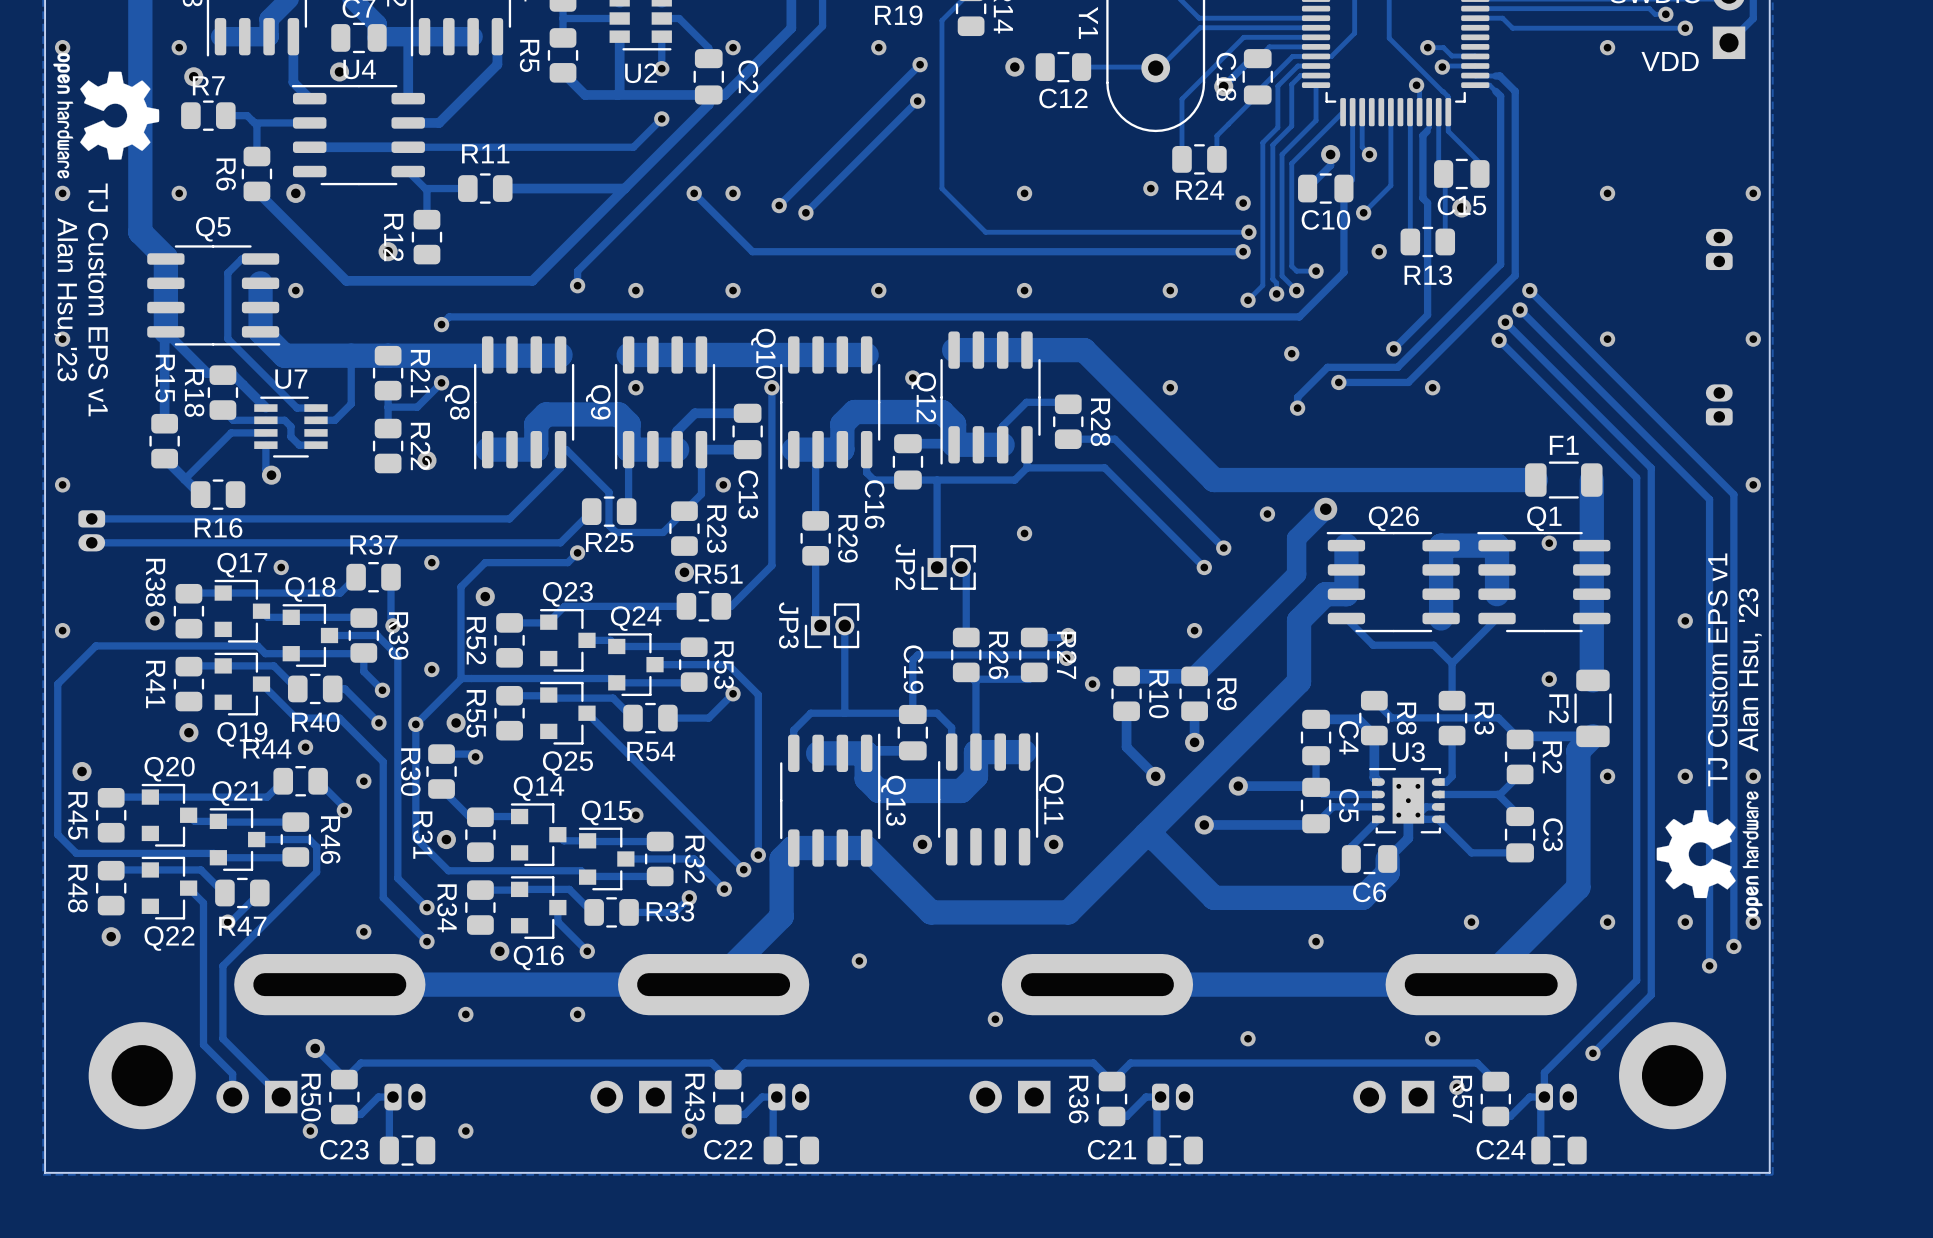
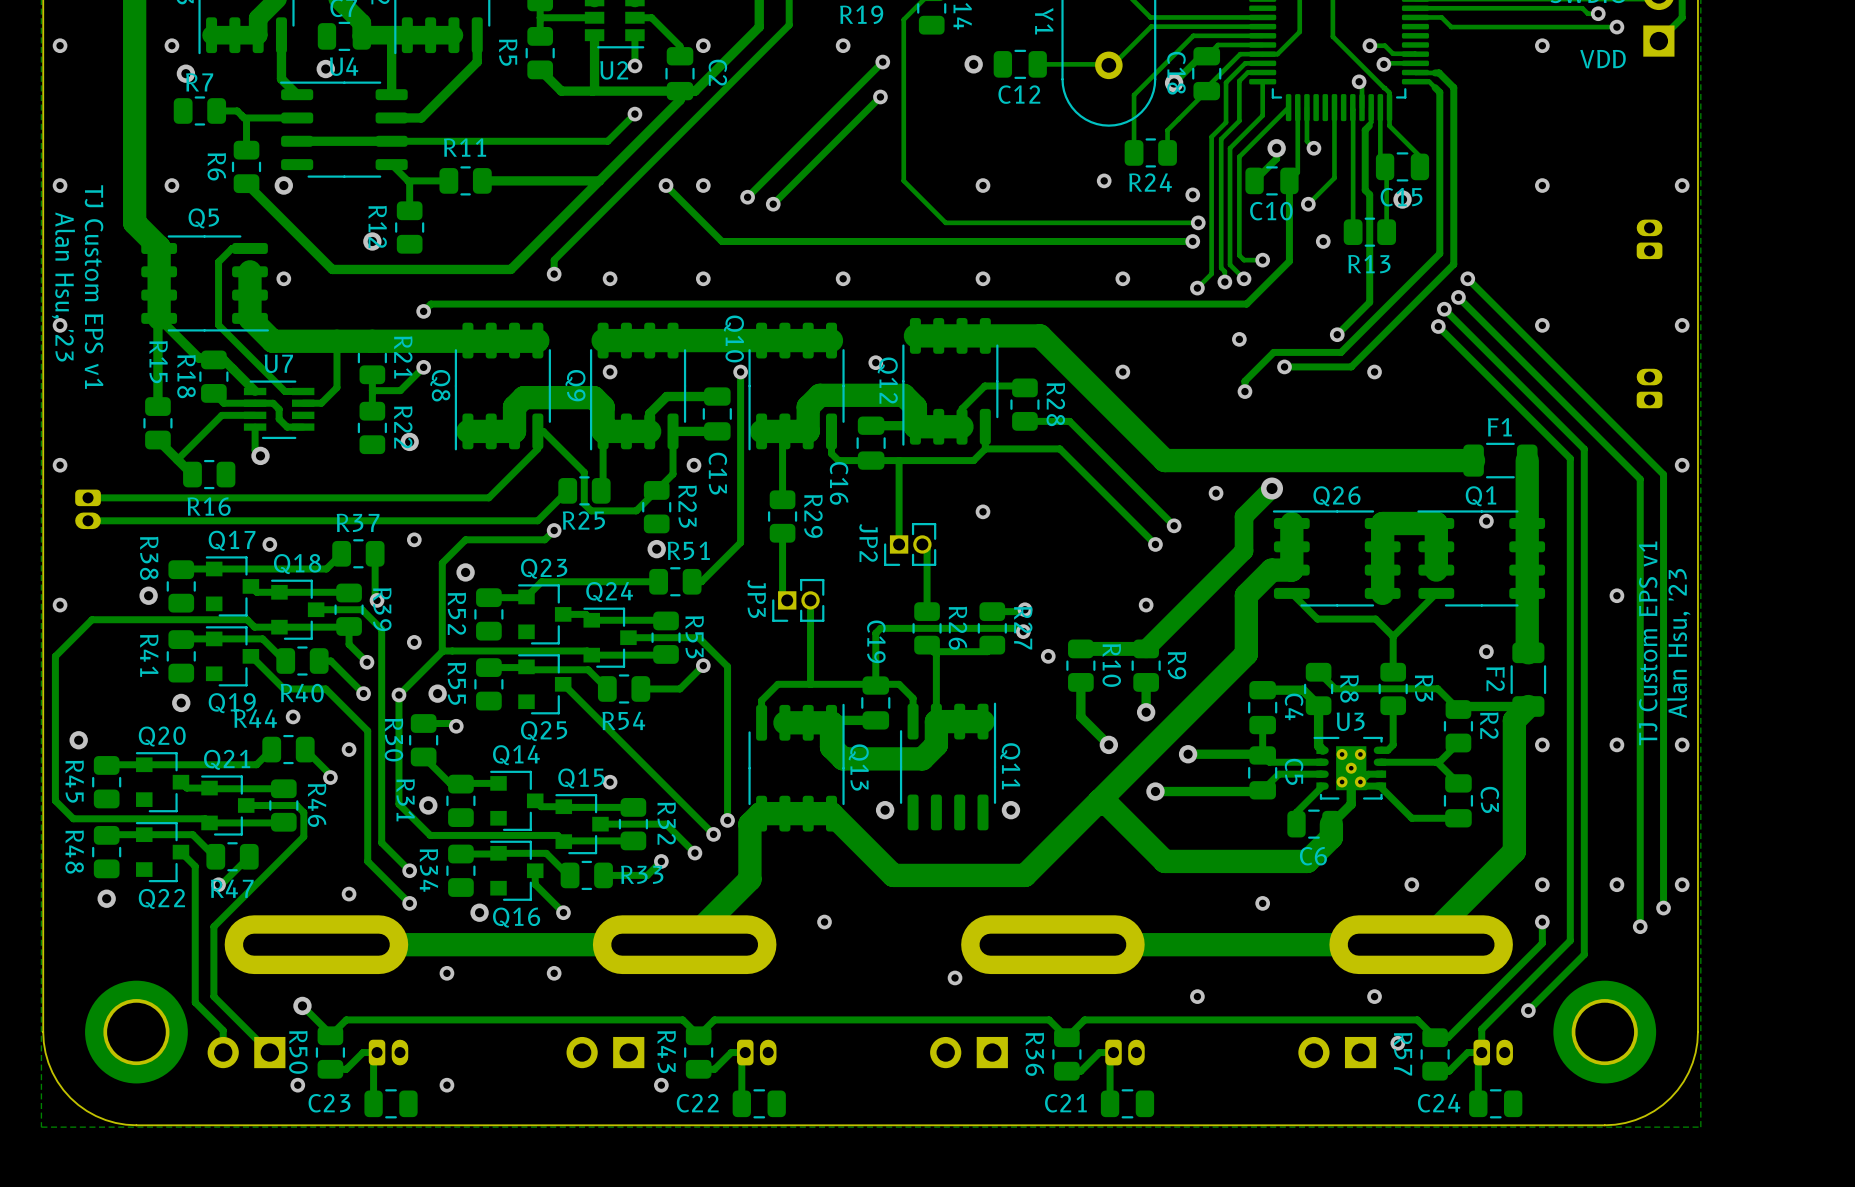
drawing: [53, 53, 160, 179] -> none
drawing: [1656, 791, 1763, 917] -> none
track: none -> (1542, 922) (1542, 943) (1447, 1037) (1435, 1037)
via: none -> (1542, 922)
board edge: (45, 1075) (45, 1172) (142, 1172) -> (43, 1032) (48, 1062) (57, 1081) (70, 1097) (86, 1111) (105, 1120) (136, 1125)
board edge: (1769, 1075) (1769, 1172) (1672, 1172) -> (1697, 1032) (1695, 1052) (1688, 1072) (1670, 1097) (1645, 1116) (1625, 1122) (1604, 1125)

